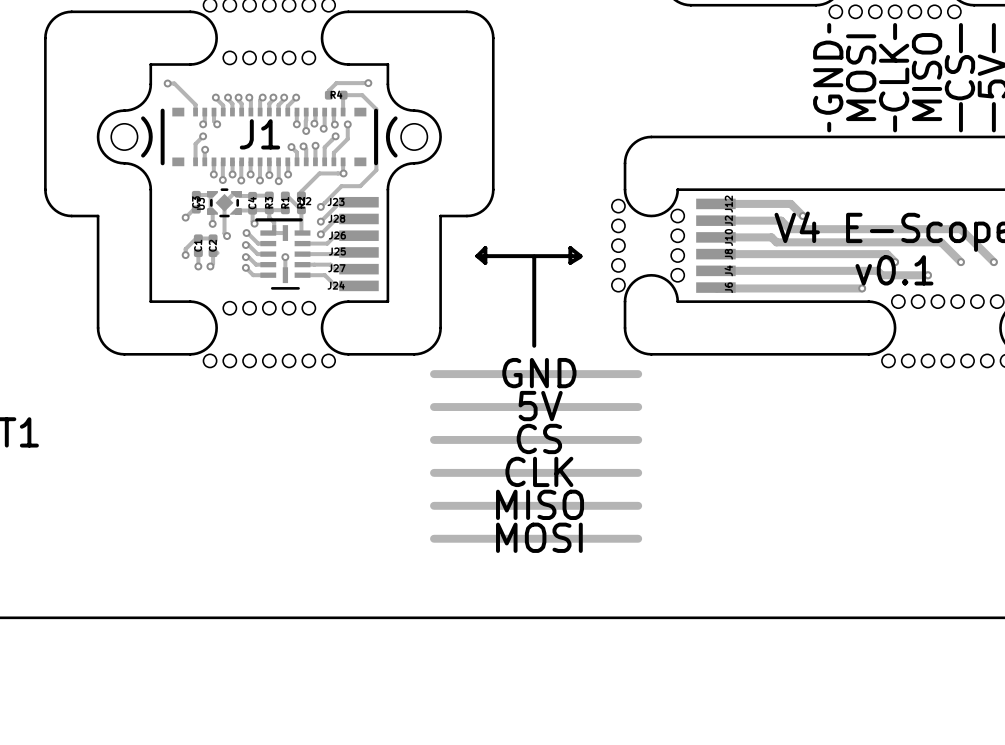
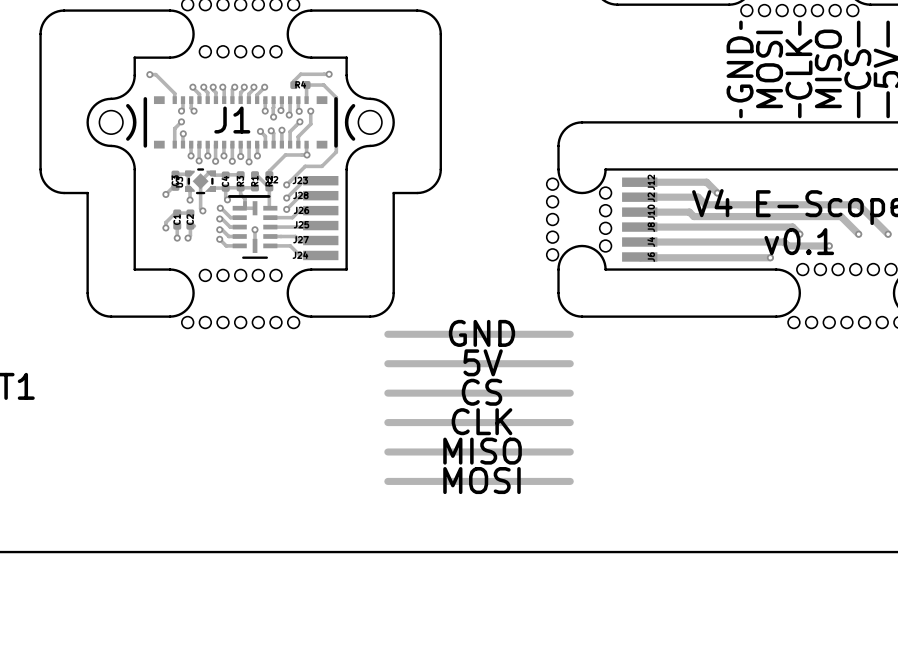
line: (477, 256) (485, 262) (485, 248) (477, 256) -> none
line: (477, 256) (580, 256) (570, 248) (570, 262) (580, 256) -> none
line: (534, 256) (534, 345) -> none

